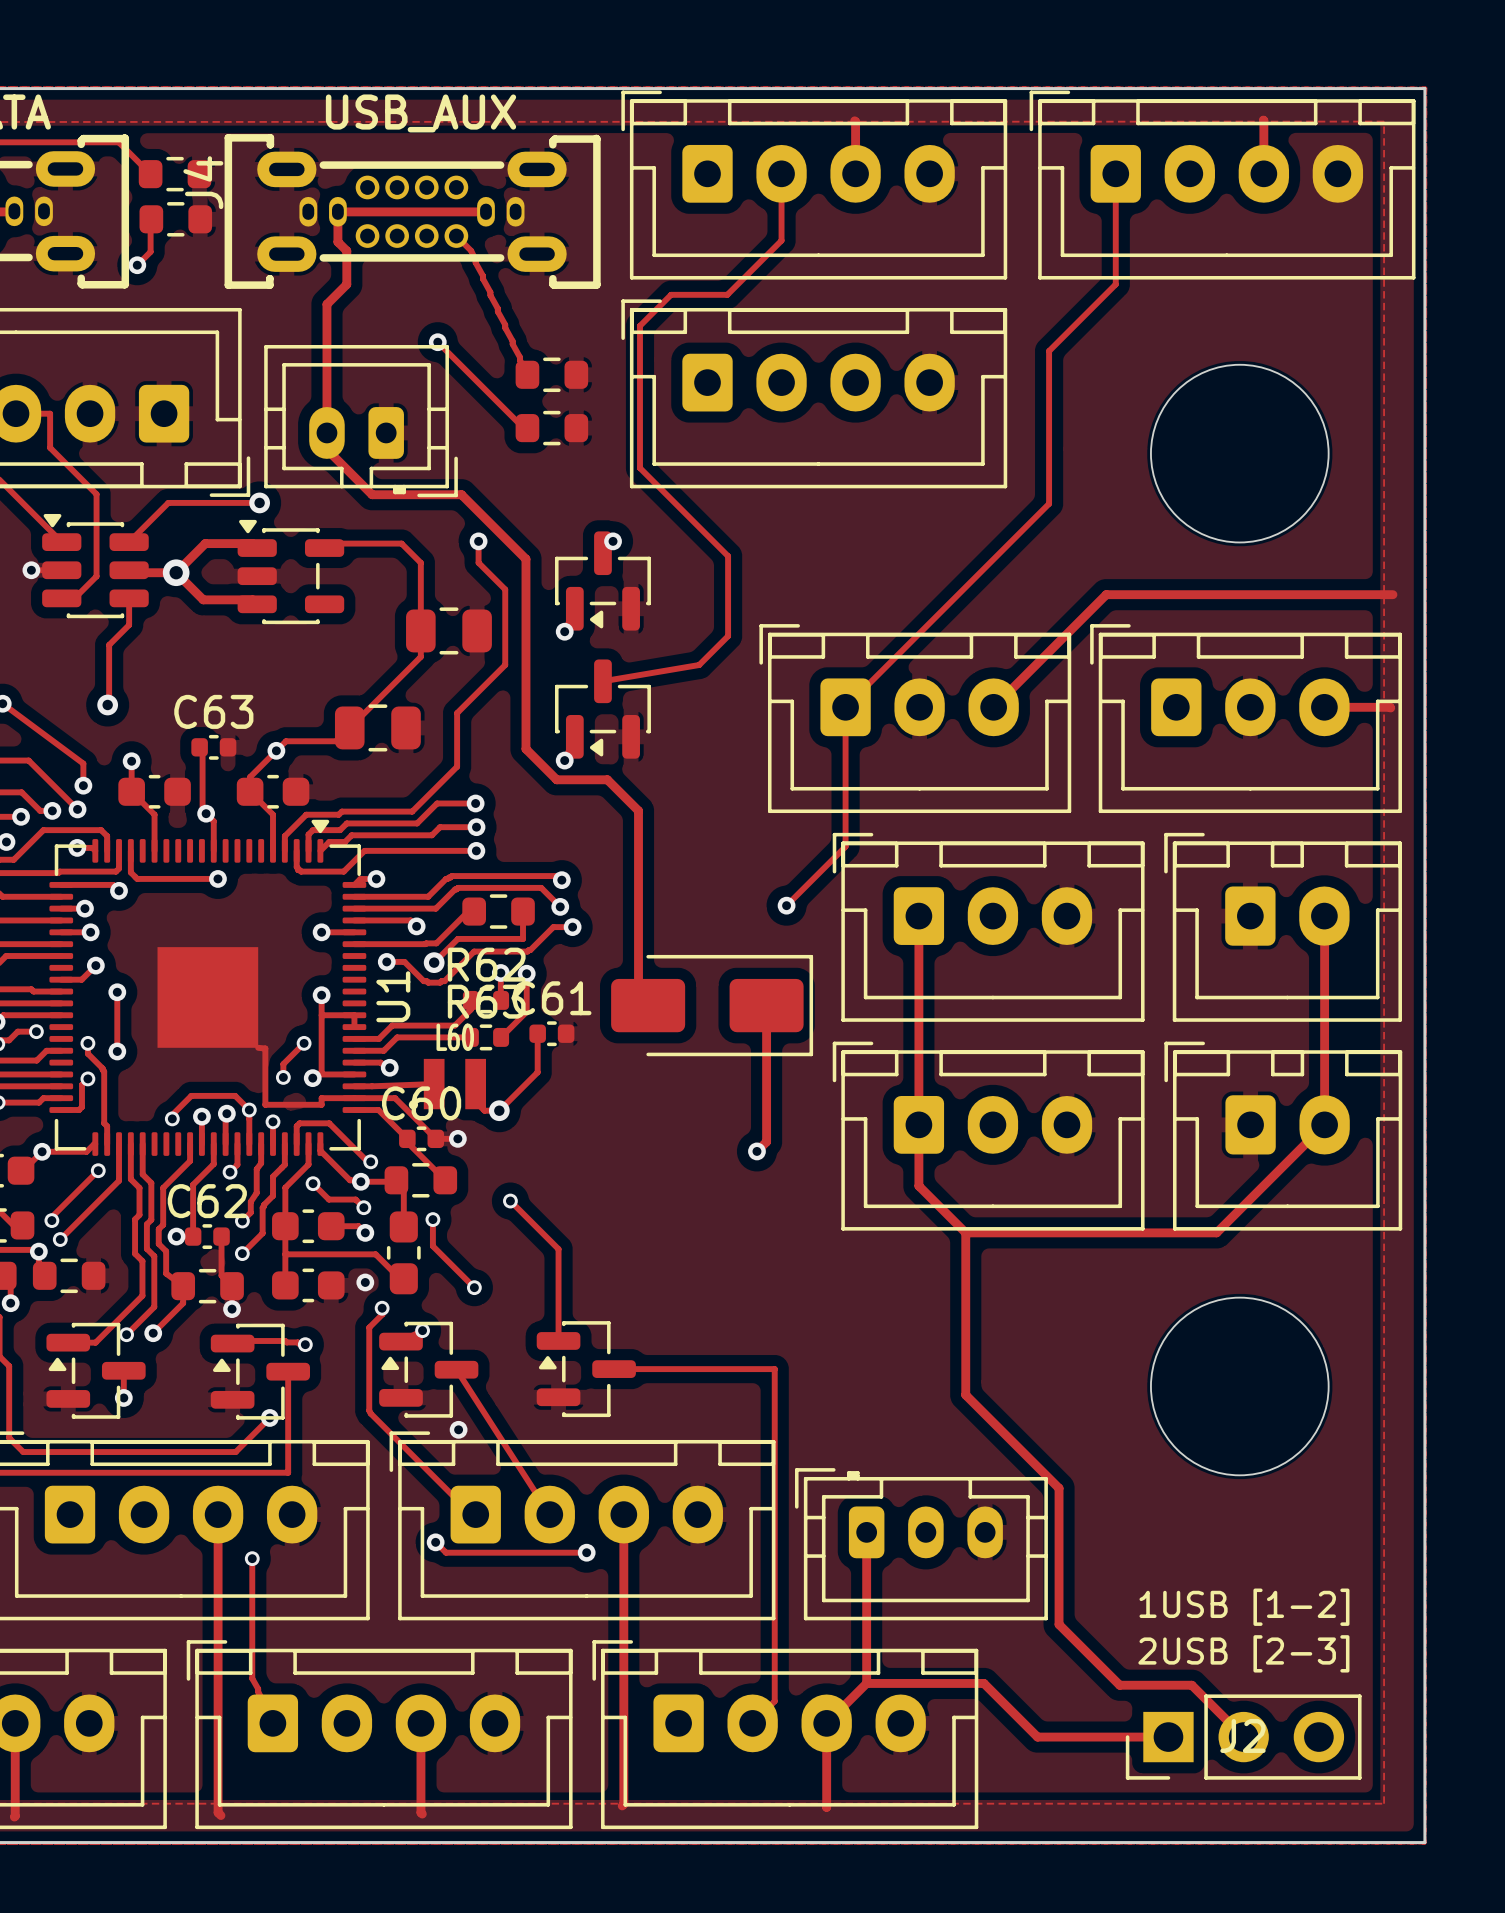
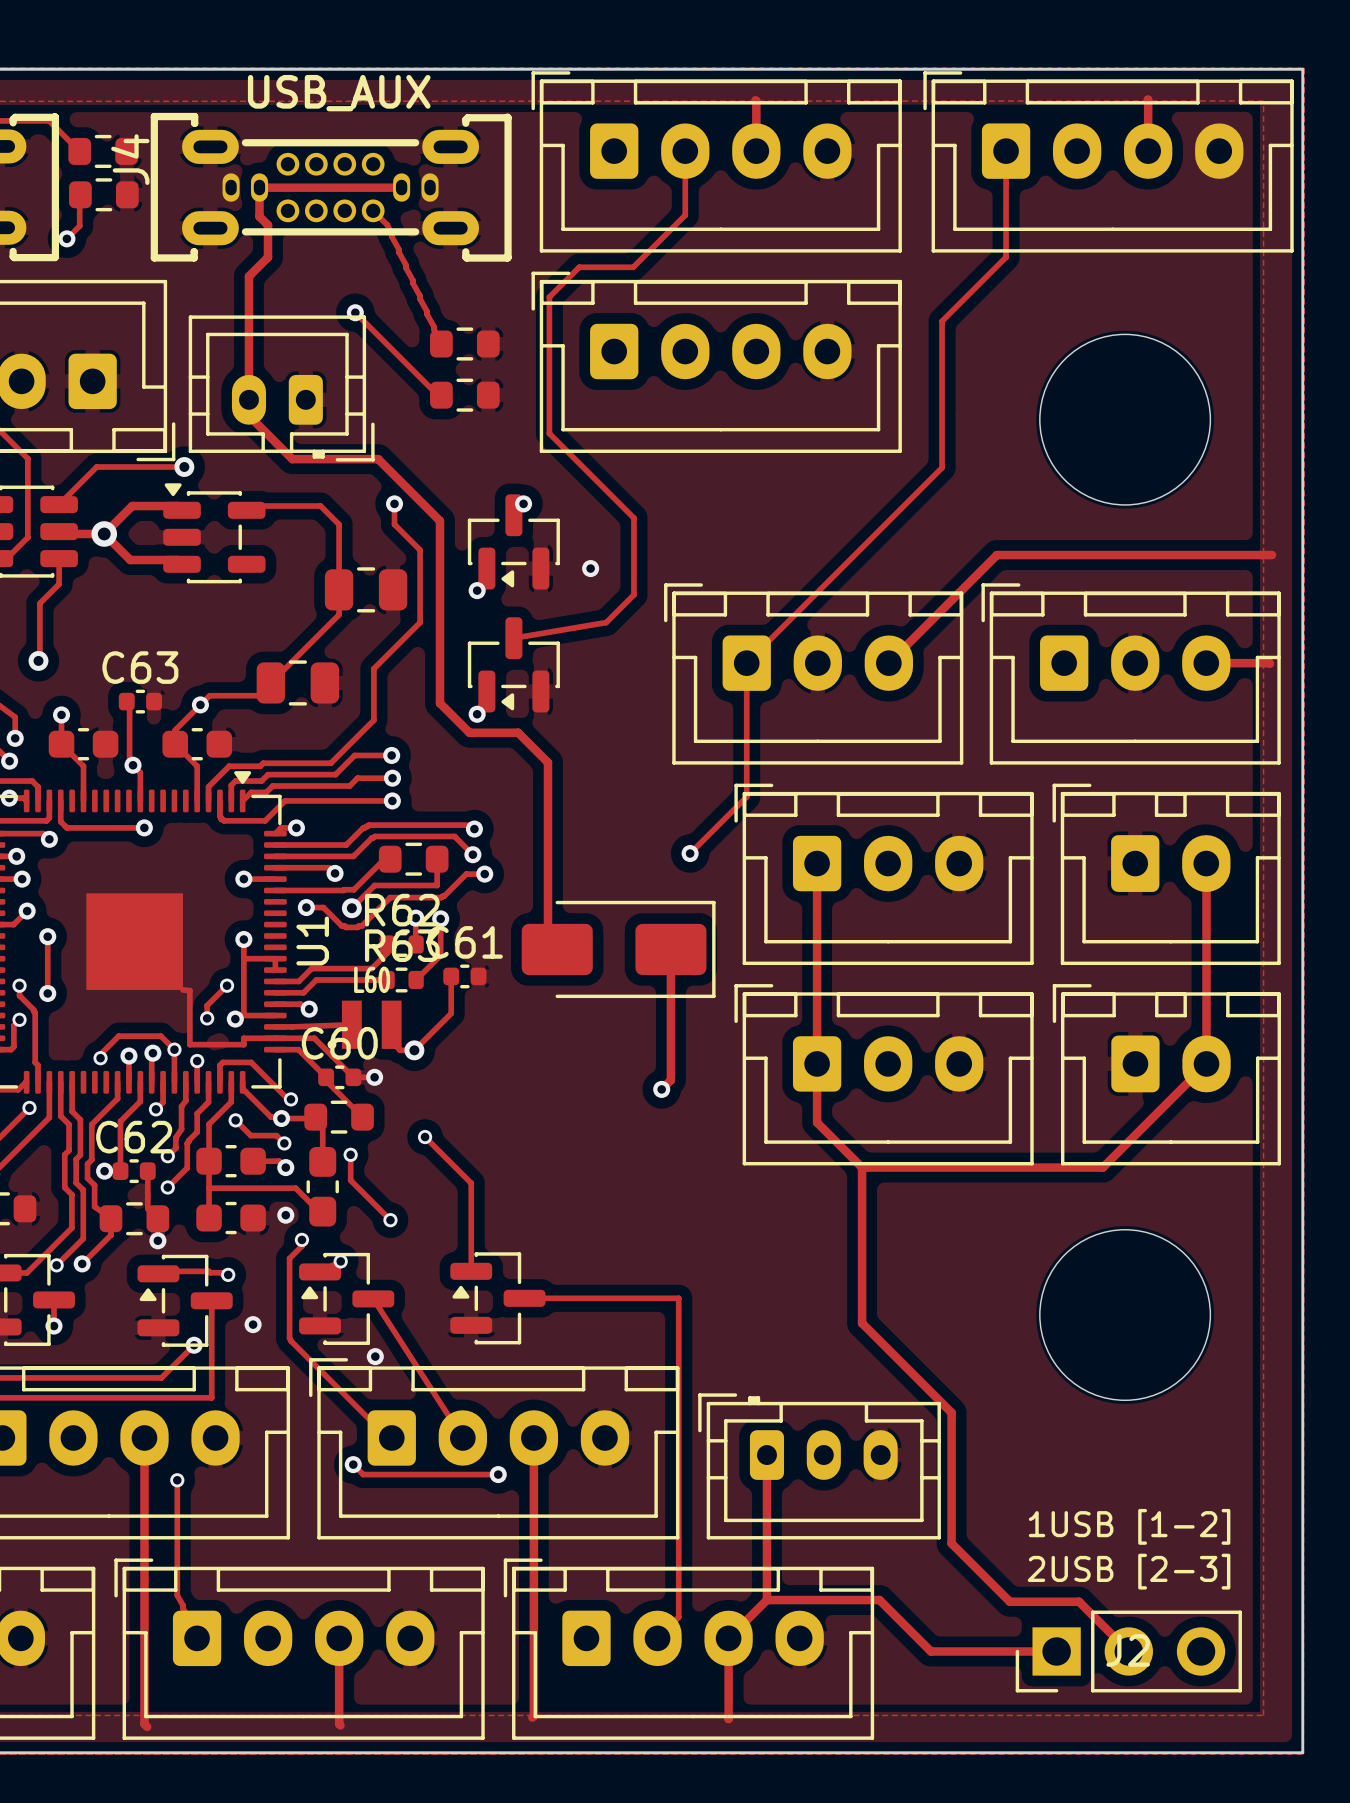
via: none -> (590, 568)
via: none -> (253, 1324)

